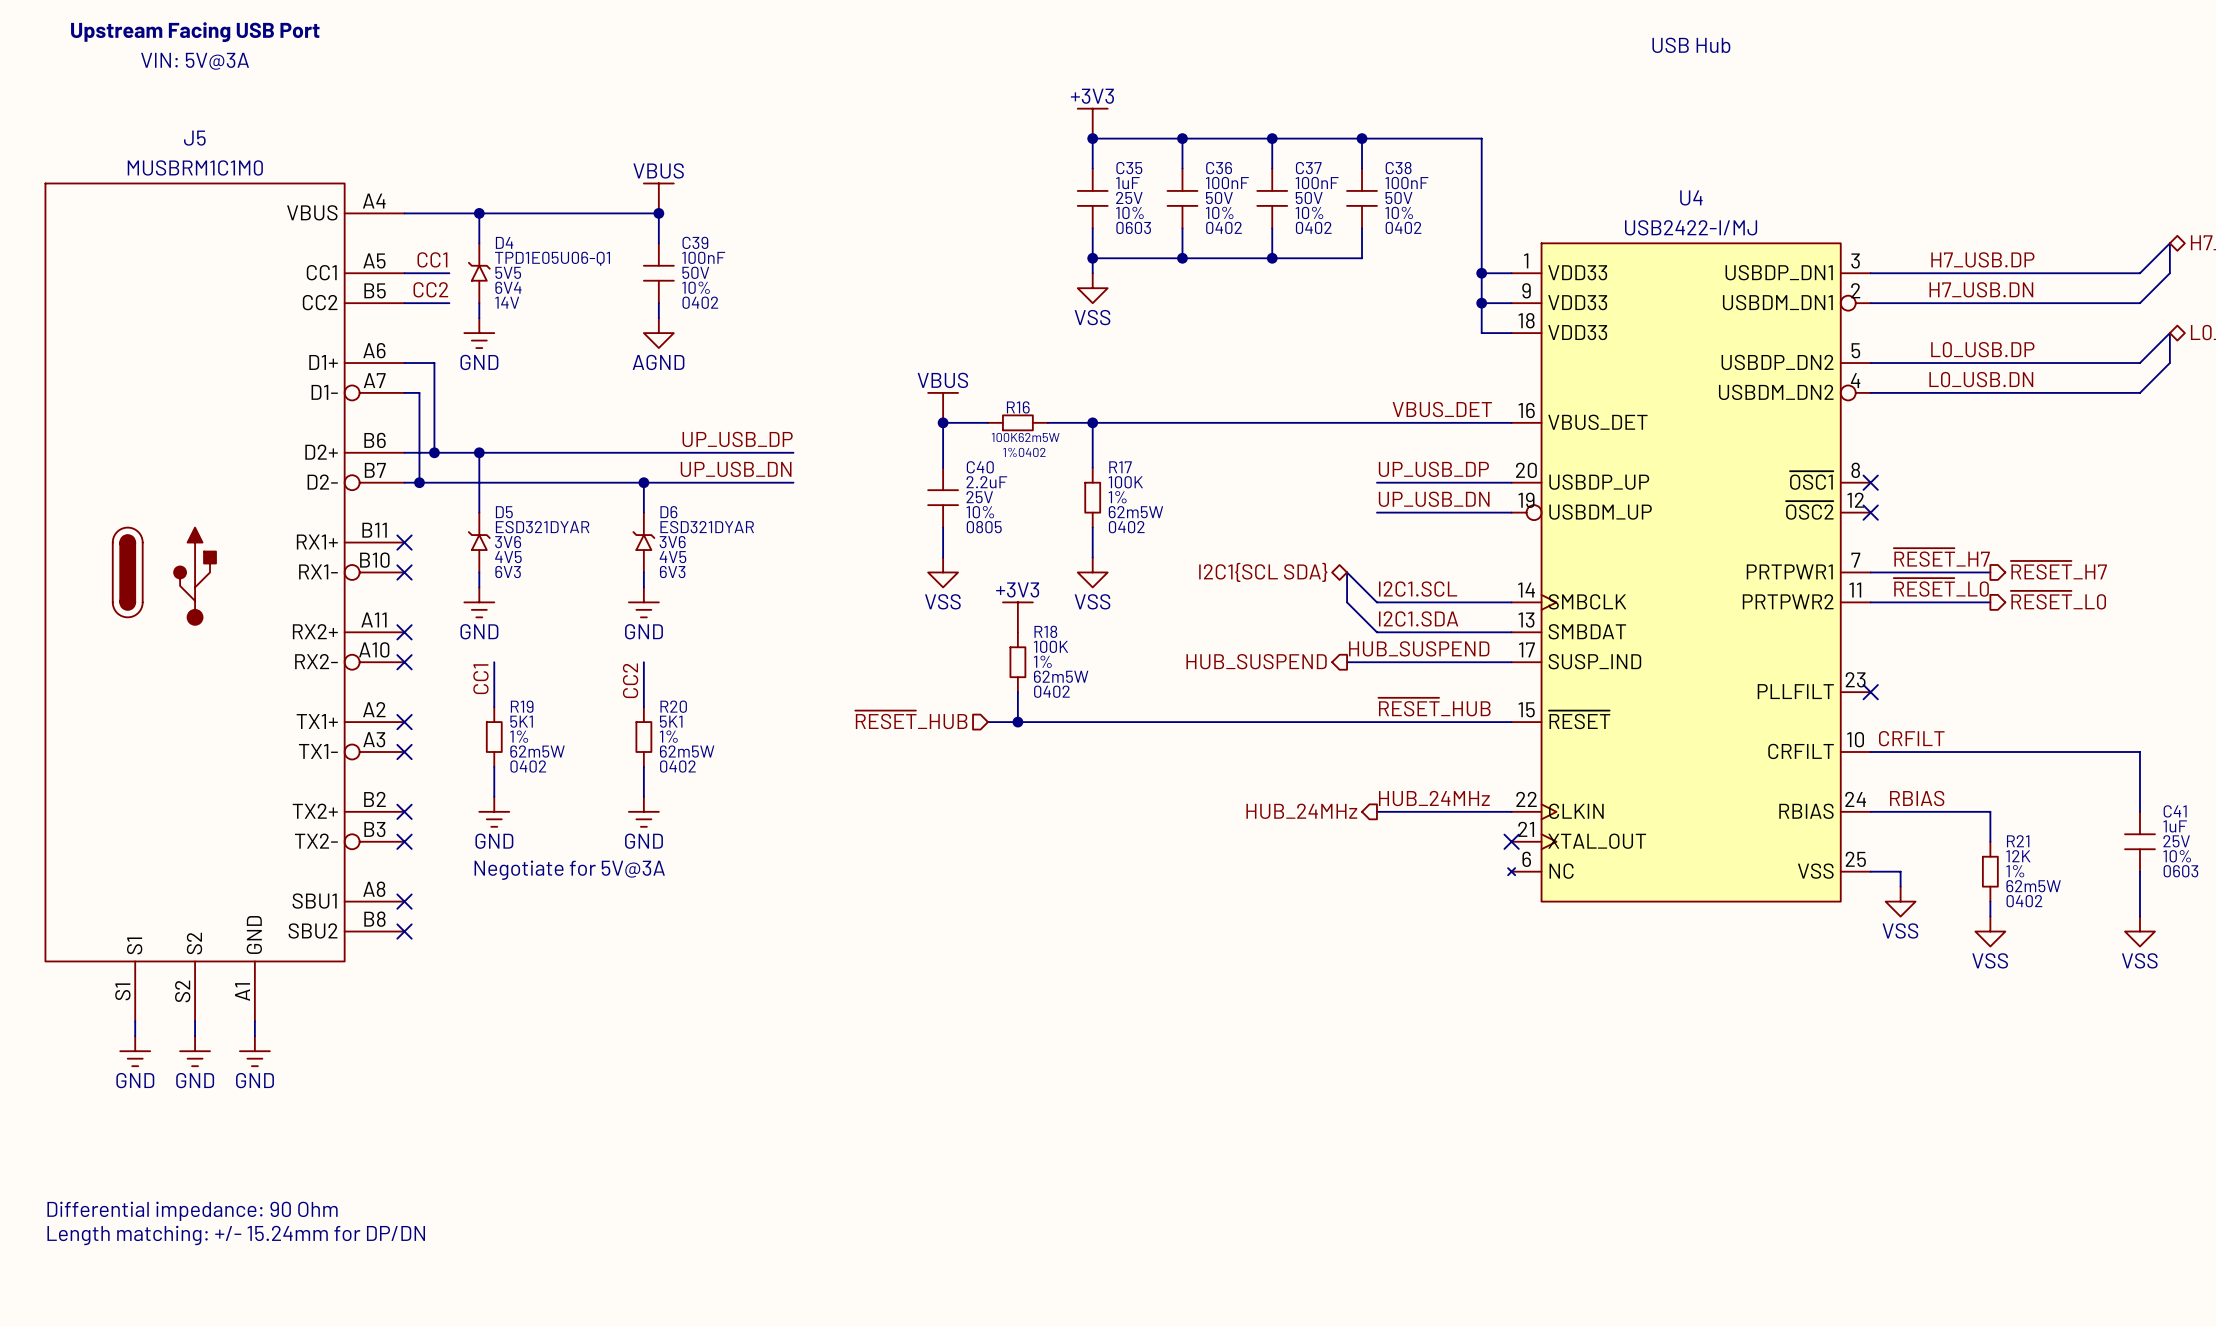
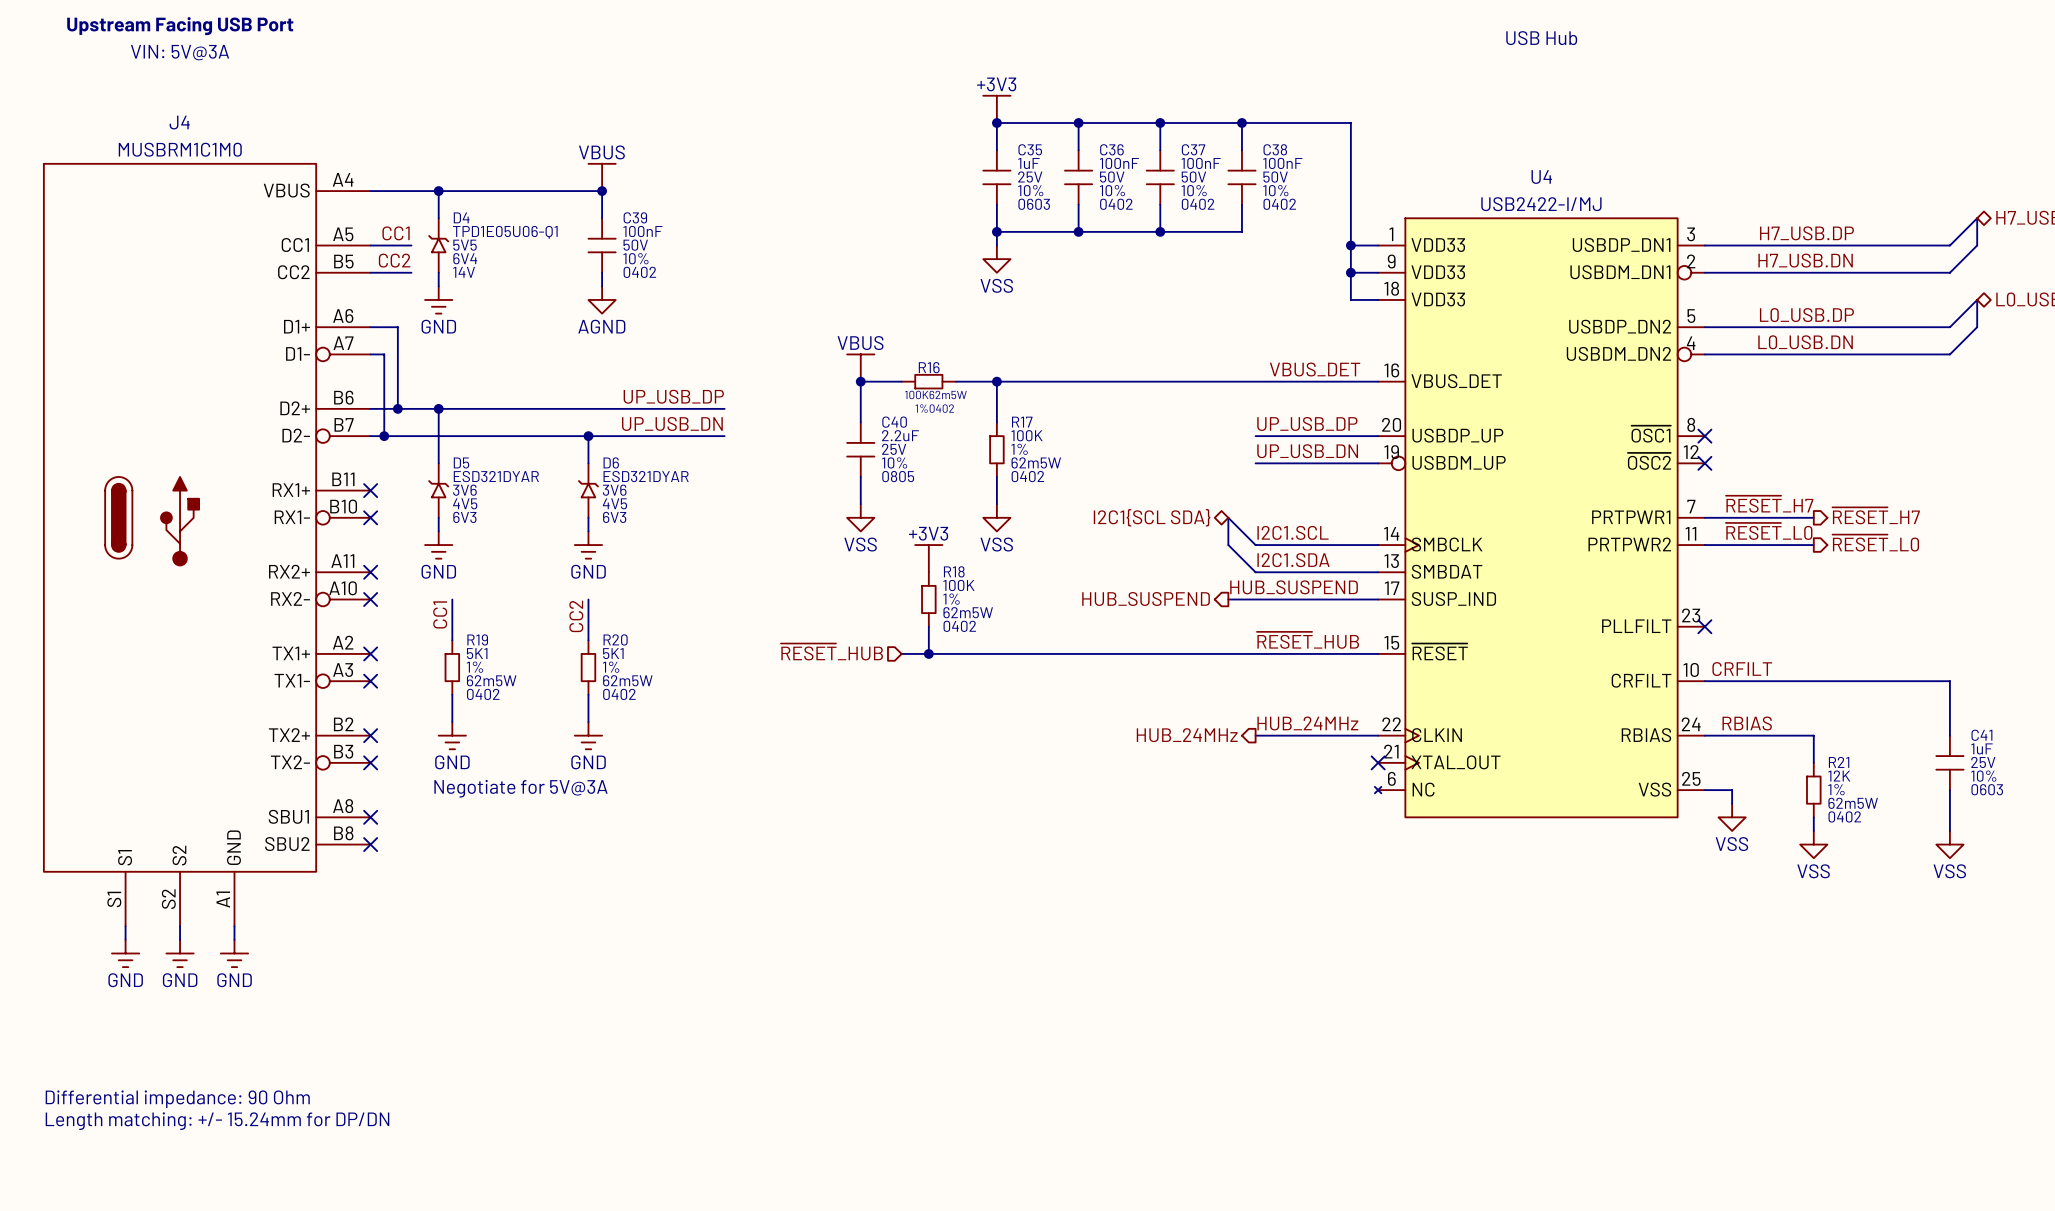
J5 name: J5 (194, 138) -> J4 (179, 122)

